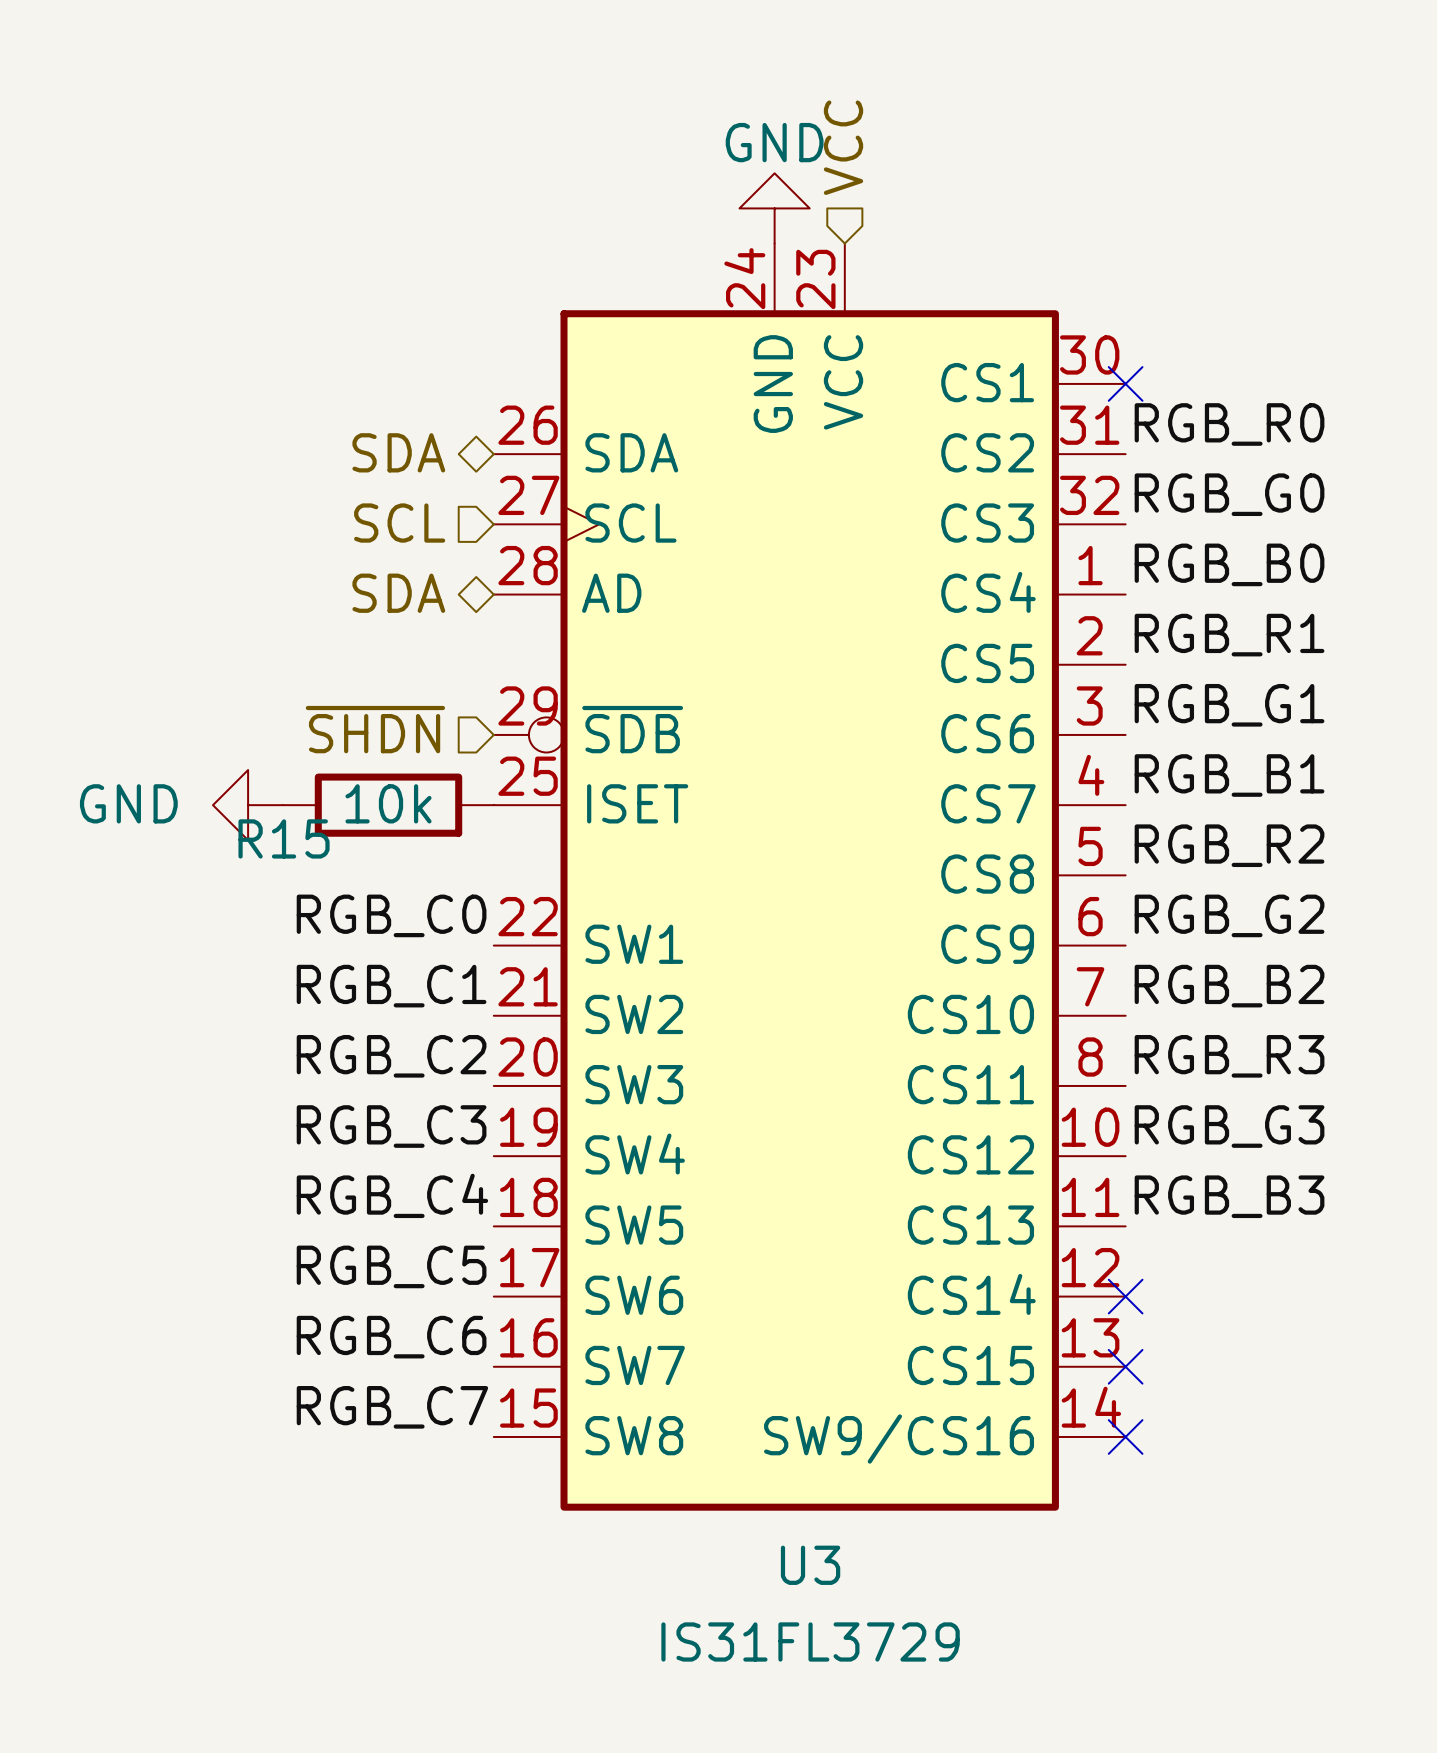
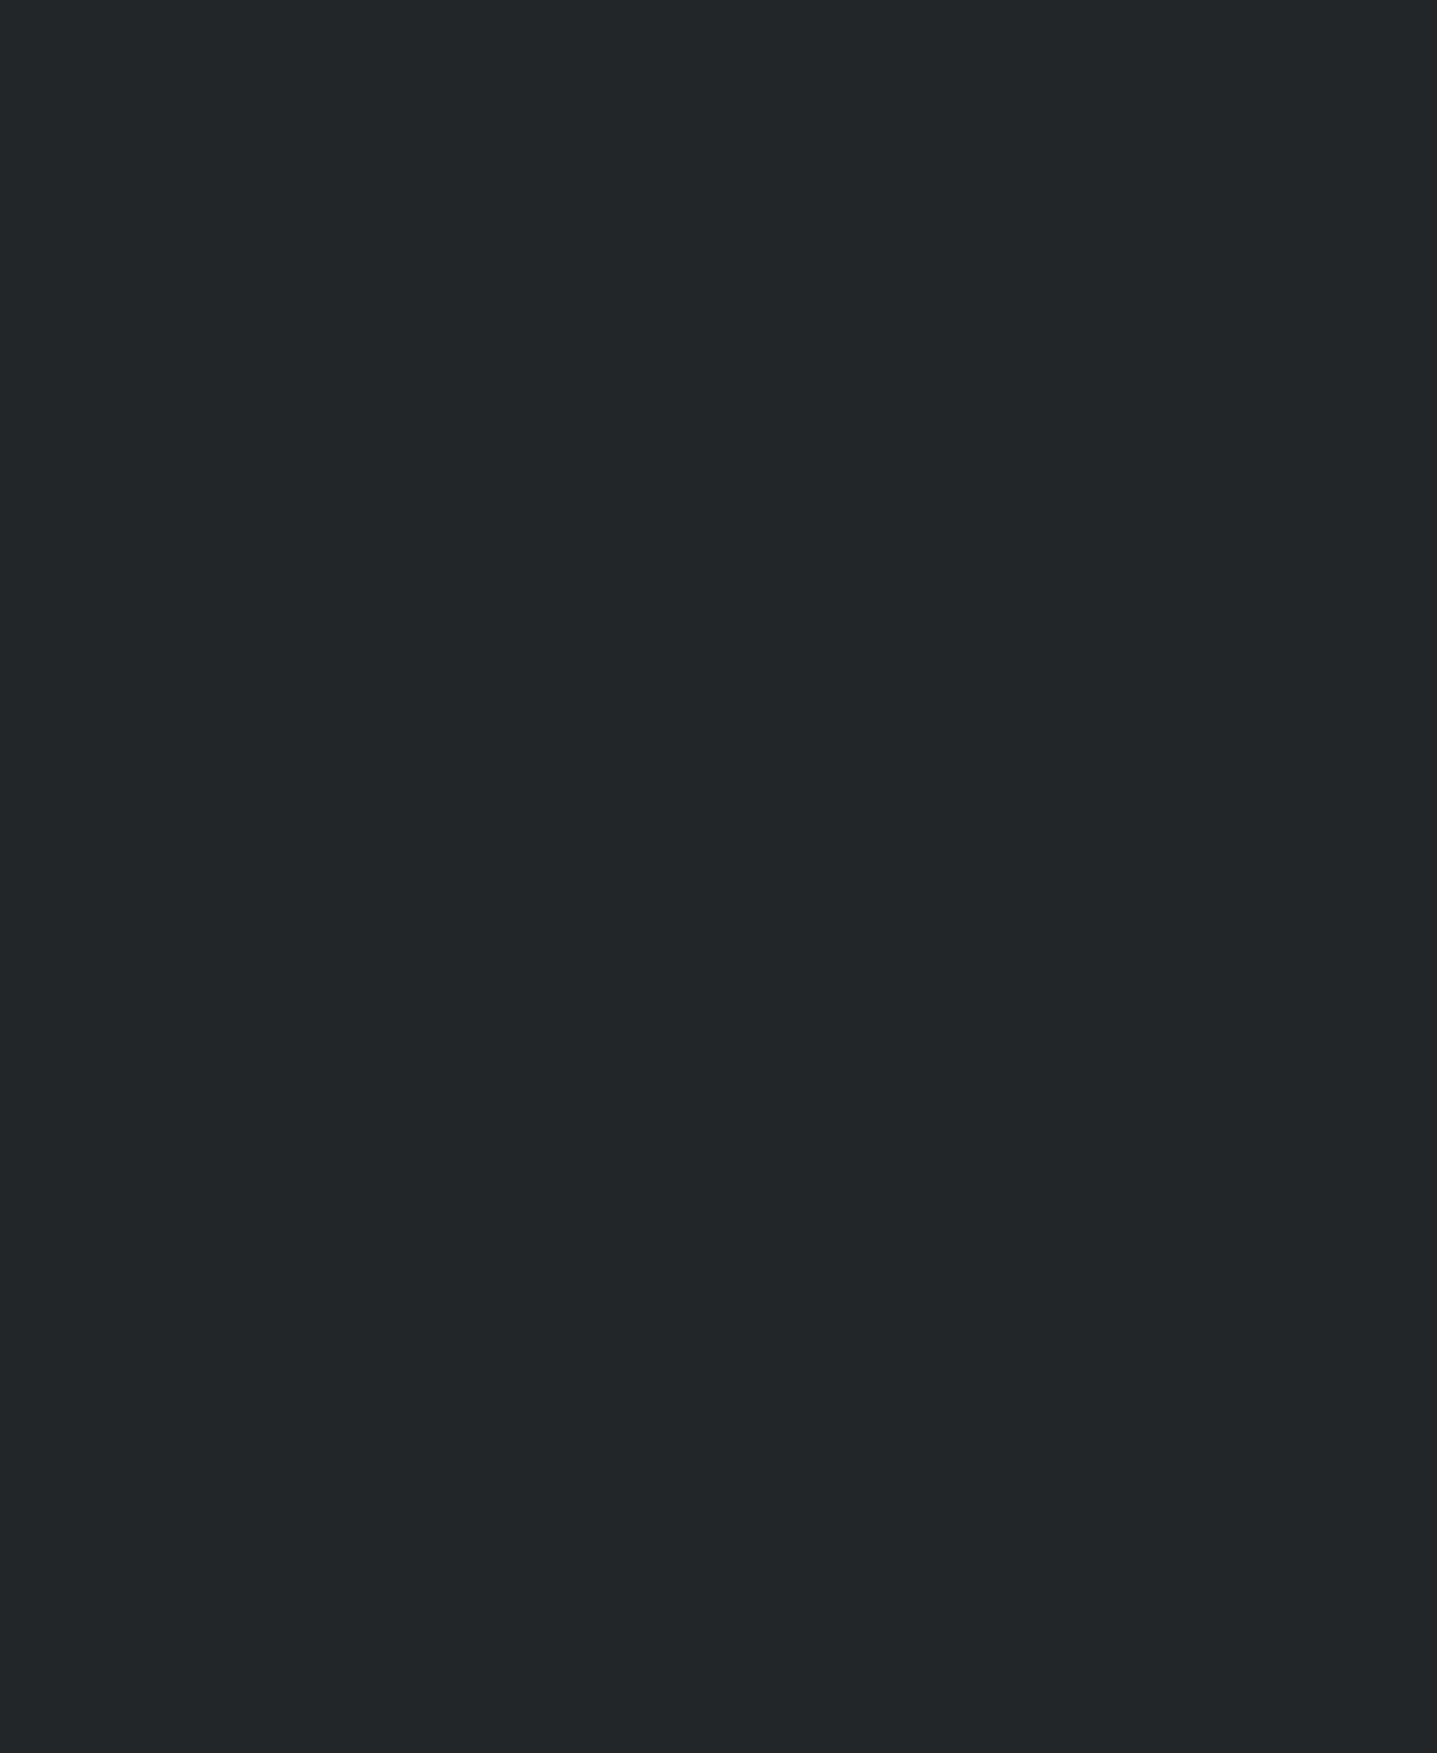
hierarchical label: VCC (843, 147) -> none
power symbol: GND (774, 208) -> none
no-connect mark: (1125, 383) -> none
label: RGB_R0 (1229, 424) -> none
hierarchical label: SDA (398, 452) -> none
label: RGB_G0 (1229, 494) -> none
hierarchical label: SCL (399, 523) -> none
label: RGB_B0 (1229, 564) -> none
hierarchical label: SDA (398, 593) -> none
label: RGB_R1 (1229, 635) -> none
label: RGB_G1 (1229, 705) -> none
hierarchical label: ~{SHDN} (375, 729) -> none
label: RGB_B1 (1229, 775) -> none
power symbol: GND (248, 805) -> none
R15: 10k (388, 805) -> none
label: RGB_R2 (1229, 845) -> none
U3: IS31FL3729 (809, 877) -> none
label: RGB_C0 (391, 915) -> none
label: RGB_G2 (1229, 915) -> none
label: RGB_C1 (391, 986) -> none
label: RGB_B2 (1229, 986) -> none
label: RGB_C2 (391, 1056) -> none
label: RGB_R3 (1229, 1056) -> none
label: RGB_C3 (391, 1126) -> none
label: RGB_G3 (1229, 1126) -> none
label: RGB_C4 (392, 1195) -> none
label: RGB_B3 (1229, 1196) -> none
label: RGB_C5 (391, 1266) -> none
no-connect mark: (1125, 1296) -> none
label: RGB_C6 (391, 1337) -> none
no-connect mark: (1125, 1366) -> none
label: RGB_C7 (392, 1407) -> none
no-connect mark: (1125, 1436) -> none

